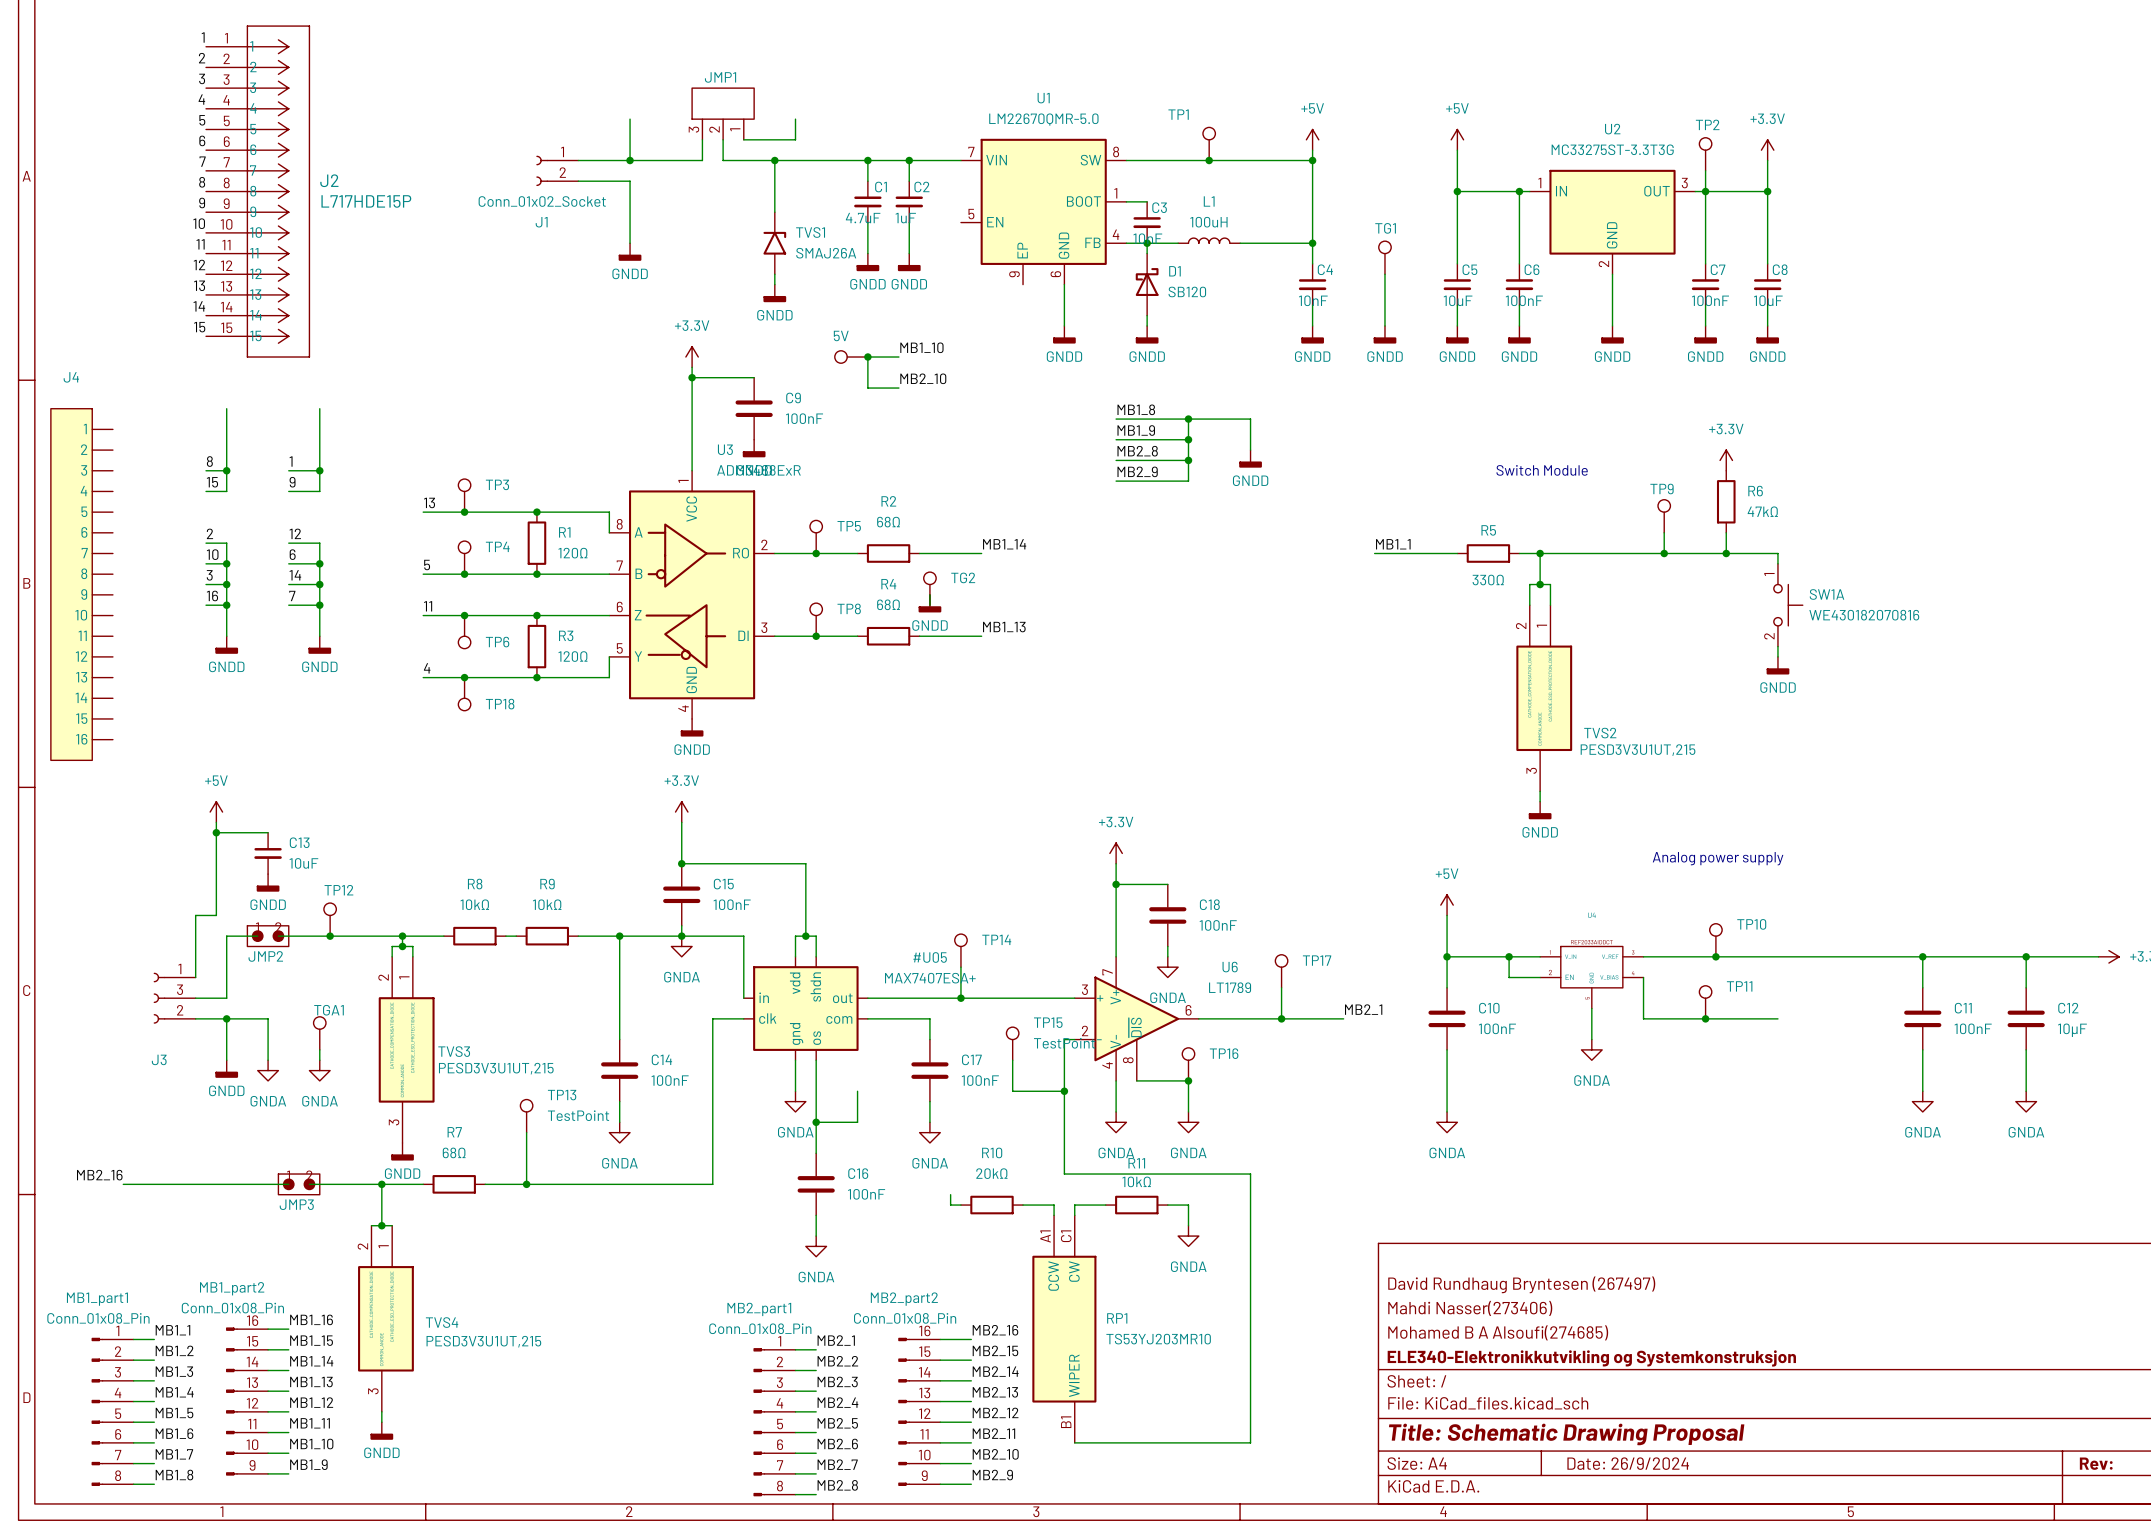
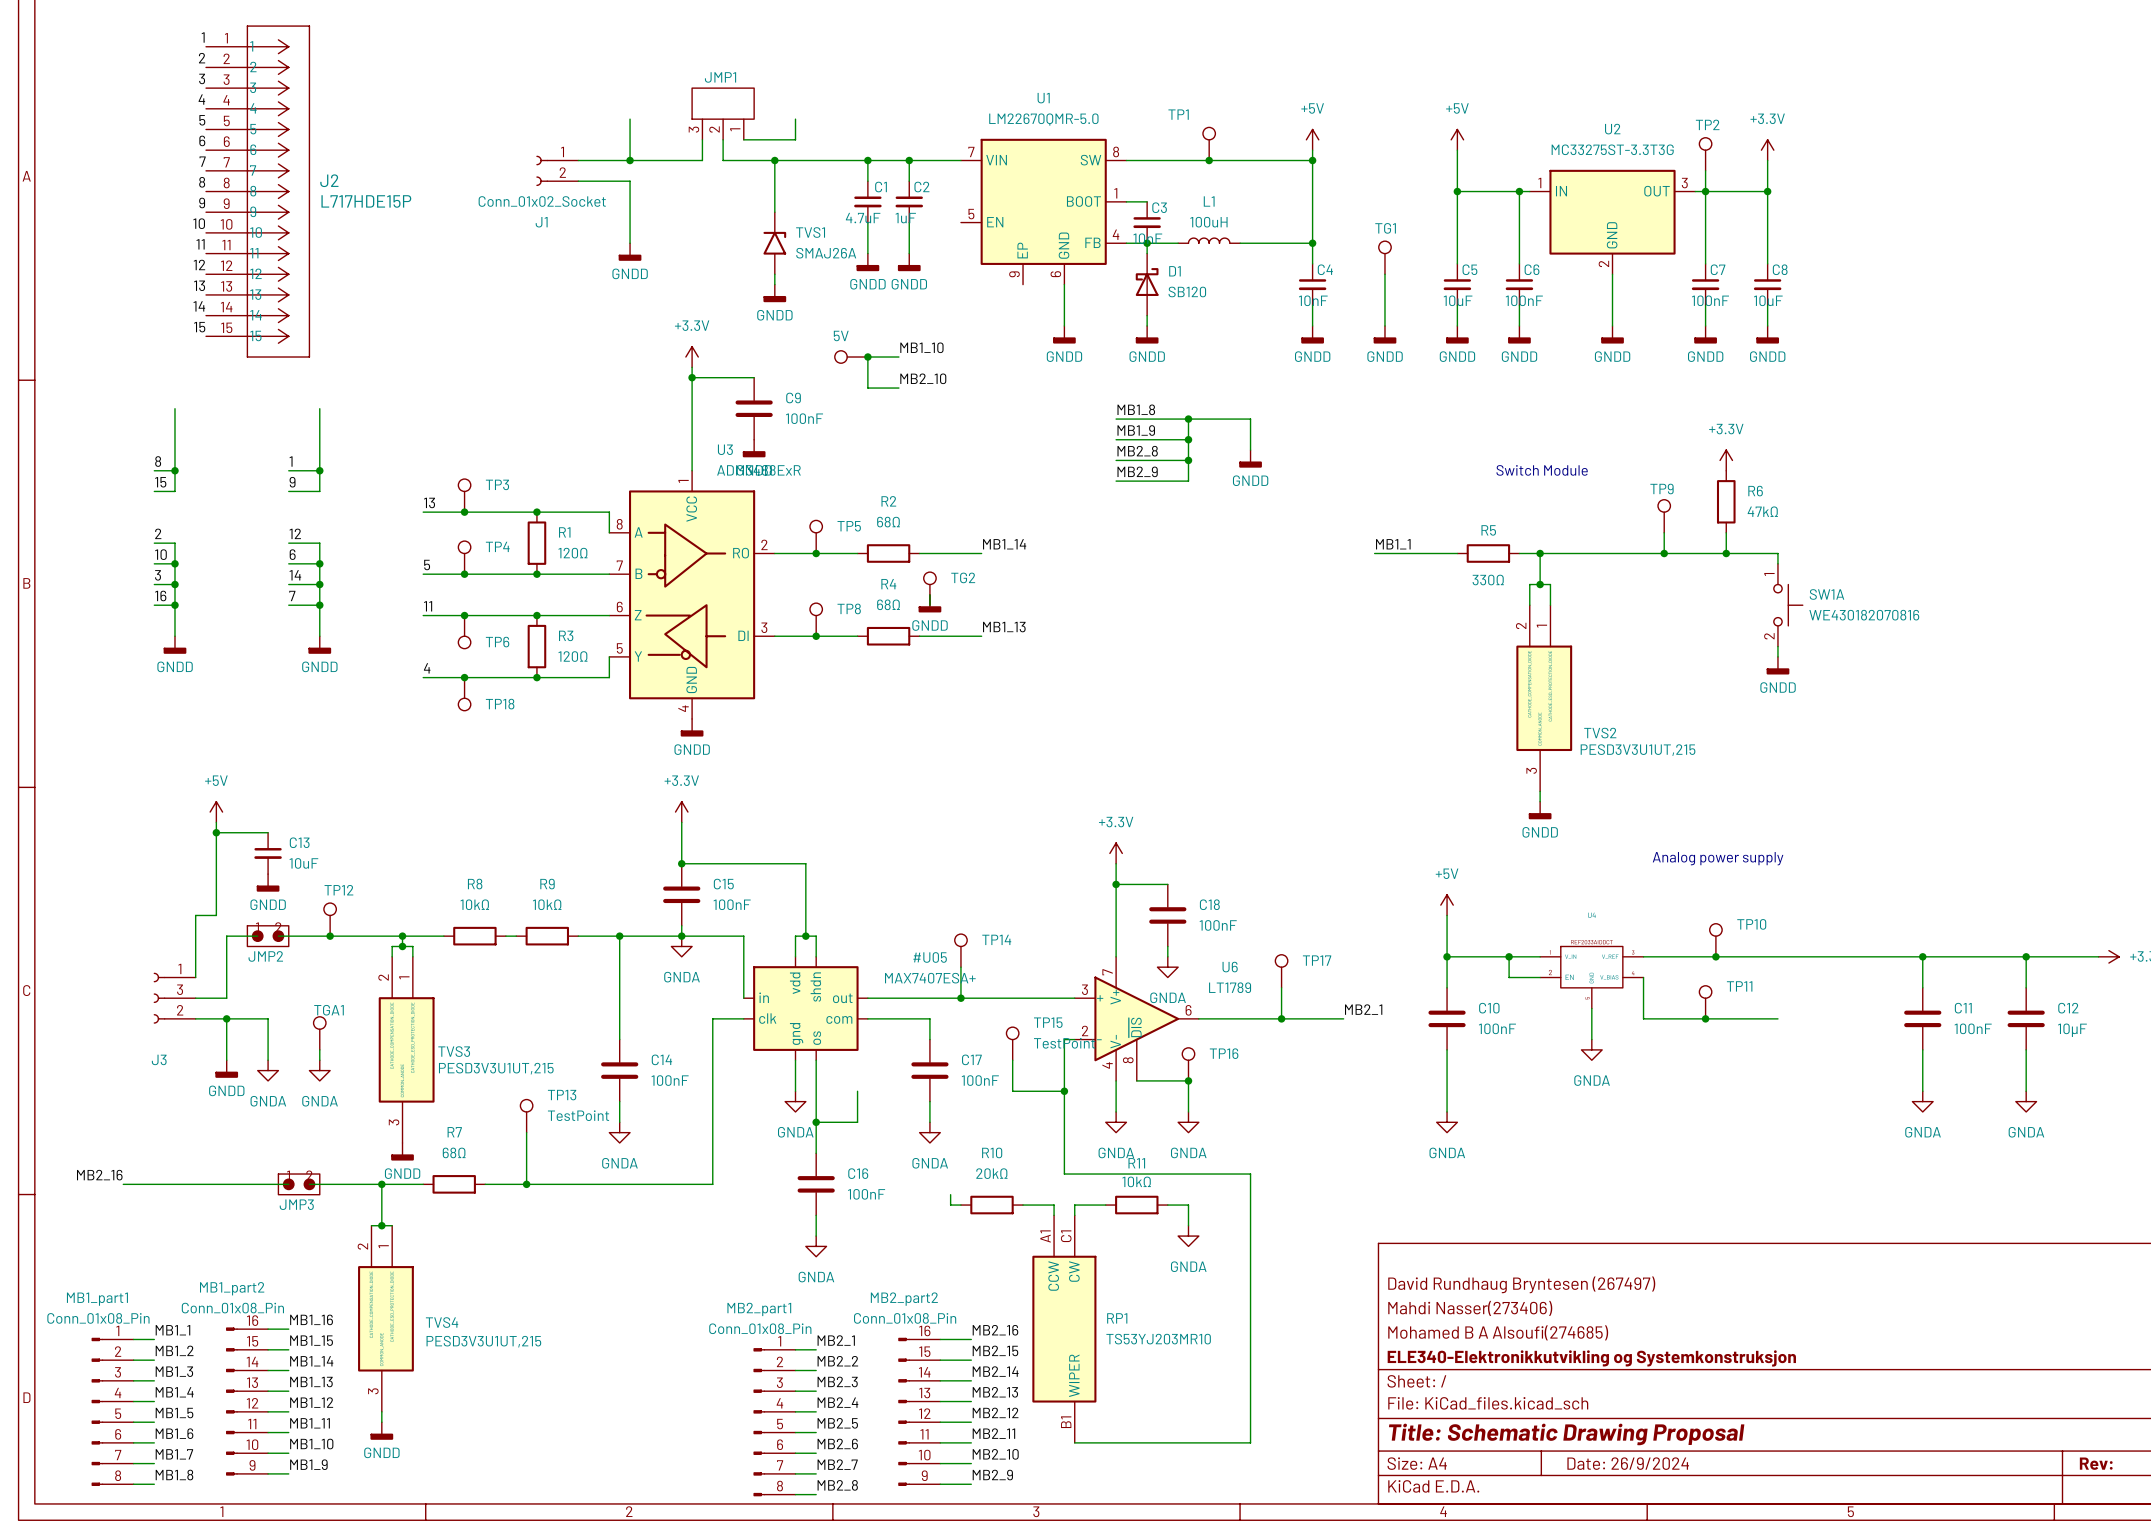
wire: (226, 408) (226, 491) (206, 491) -> (174, 408) (174, 491) (154, 491)
label position: 8 (209, 461) -> 8 (158, 461)
junction: none -> (174, 470)
wire: (206, 470) (226, 470) -> (154, 470) (174, 470)
junction: (226, 470) -> none
label position: 15 (212, 482) -> 15 (160, 482)
label position: 2 (209, 533) -> 2 (158, 533)
wire: (206, 543) (226, 543) (226, 636) -> (154, 543) (174, 543) (174, 636)
label position: 10 (212, 554) -> 10 (160, 554)
junction: none -> (174, 563)
wire: (206, 563) (226, 563) -> (154, 563) (174, 563)
junction: (226, 563) -> none
label position: 3 (209, 575) -> 3 (158, 575)
J4: (81, 584) -> none
junction: none -> (174, 584)
wire: (206, 584) (226, 584) -> (154, 584) (174, 584)
junction: (226, 584) -> none
label position: 16 (212, 595) -> 16 (160, 595)
junction: none -> (174, 605)
wire: (206, 605) (226, 605) -> (154, 605) (174, 605)
junction: (226, 605) -> none
power symbol position: GNDD (226, 645) -> GNDD (174, 645)

